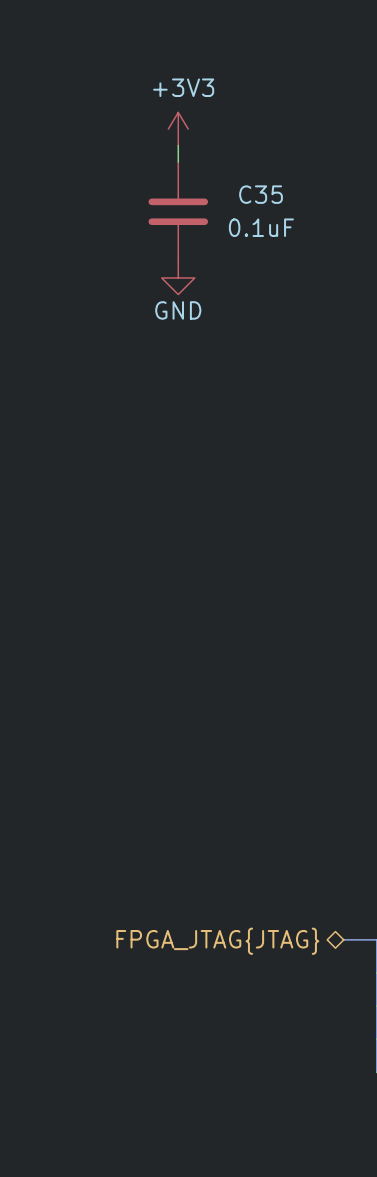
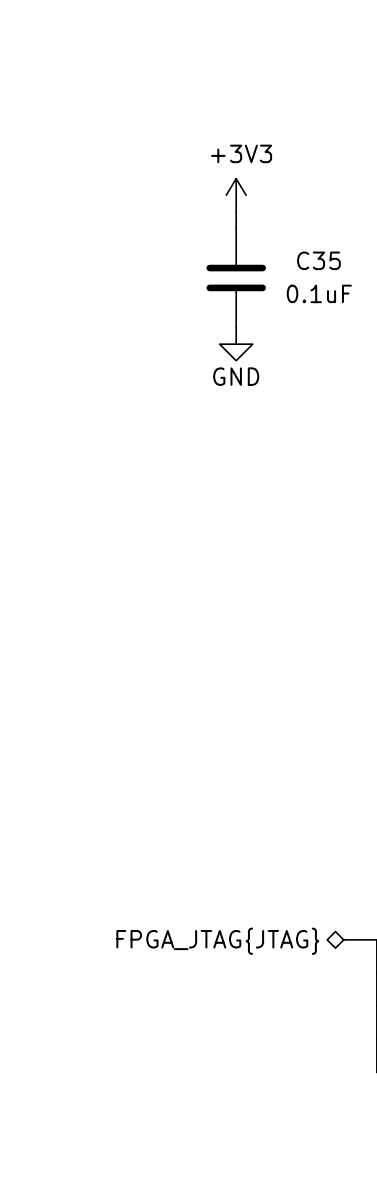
power symbol position: +3V3 (178, 129) -> +3V3 (236, 195)
wire: (178, 145) (178, 162) -> (236, 211) (236, 228)
C35 position: (178, 211) -> (236, 277)
power symbol position: GND (178, 277) -> GND (236, 344)

